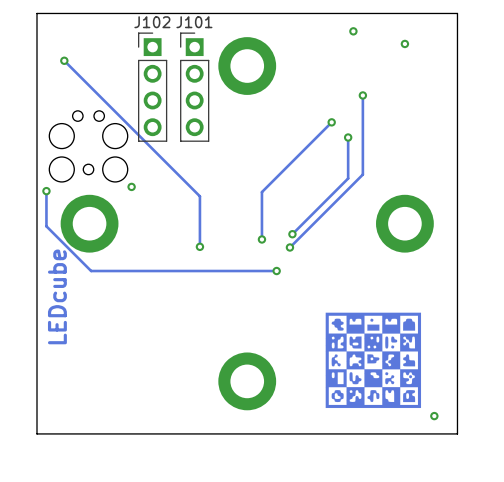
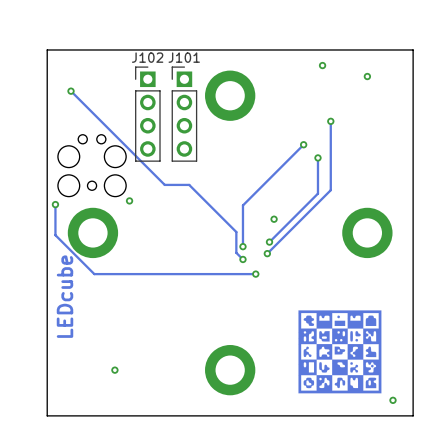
track: (172, 168) (199, 196) (199, 246) -> (164, 184) (189, 184) (236, 232) (236, 252) (242, 259)
via: none -> (274, 219)
via: (199, 246) -> none
via: none -> (242, 259)
via: none -> (114, 370)

